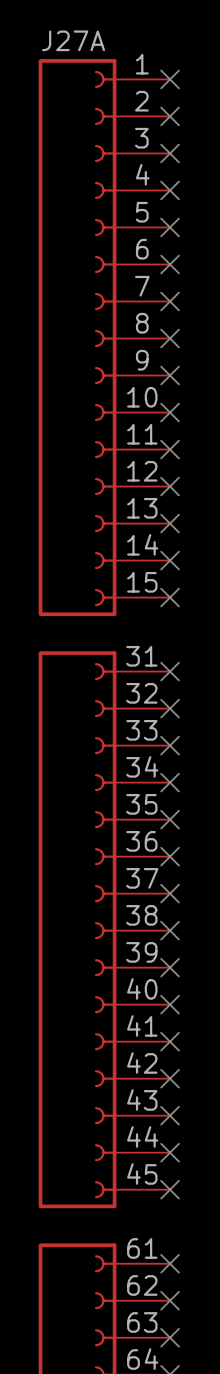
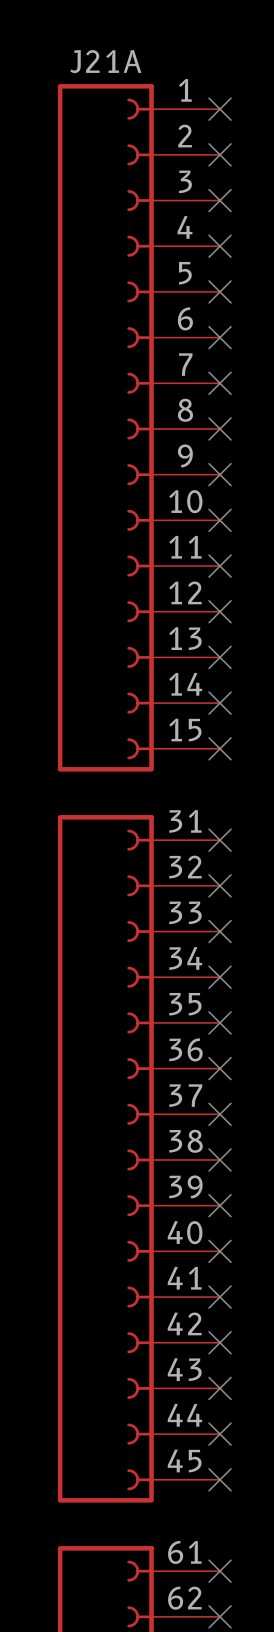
J27A name: J27A (73, 40) -> J21A (105, 61)

